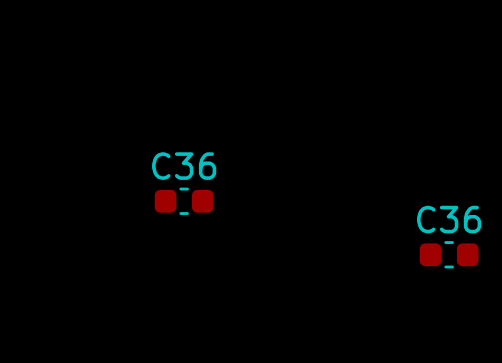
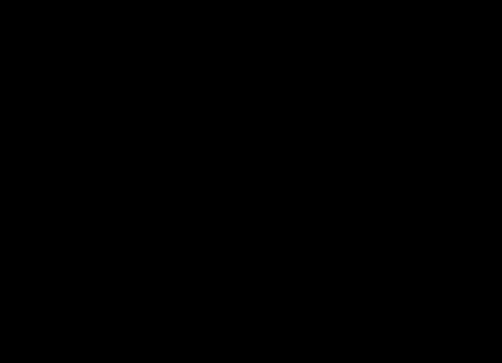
C36: (184, 201) -> none
C36: (449, 254) -> none

